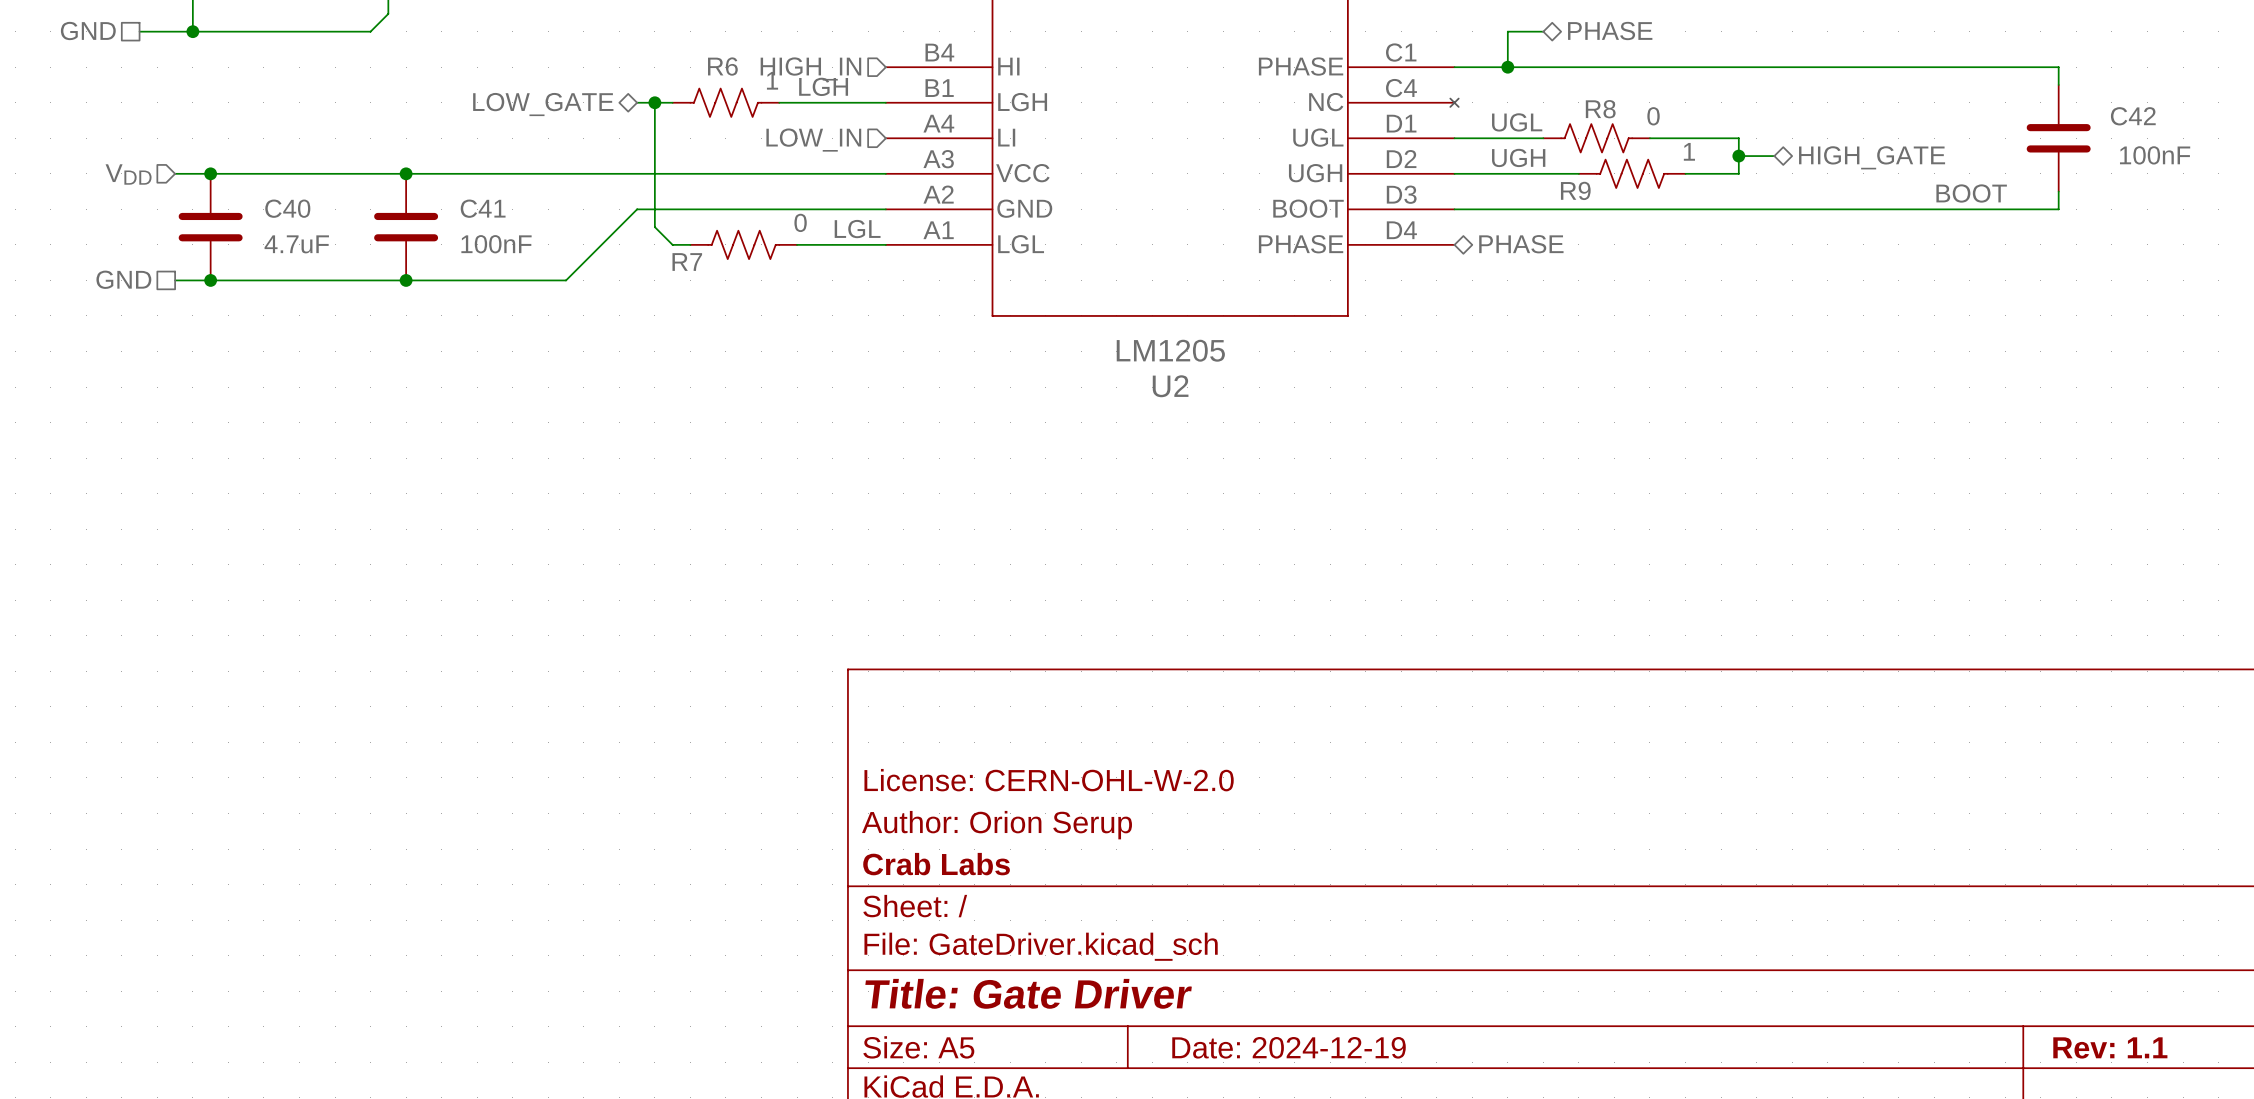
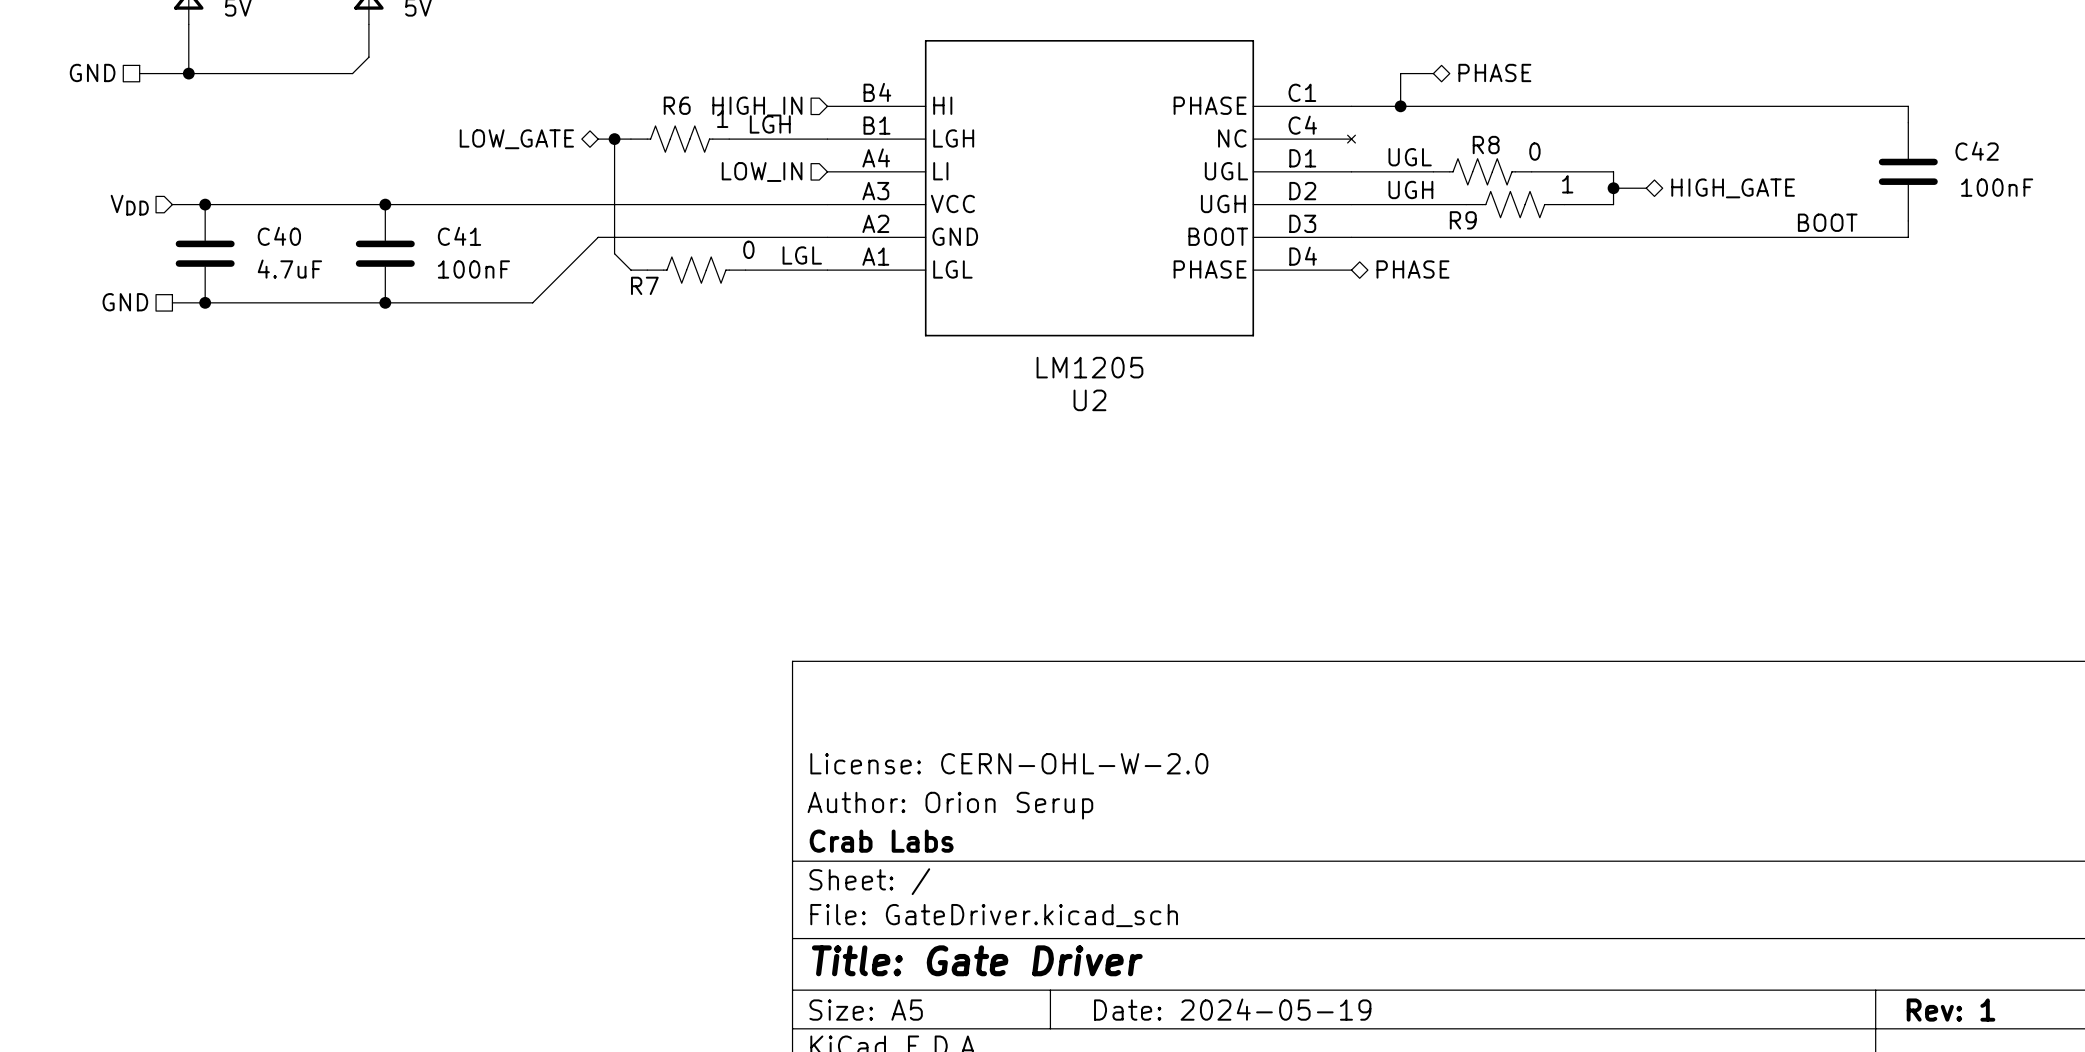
title block: Date: 2024-12-19 (1289, 1047) -> Date: 2024-05-19 (1232, 1009)
title block: Rev: 1.1 (2110, 1047) -> Rev: 1 (1950, 1010)

